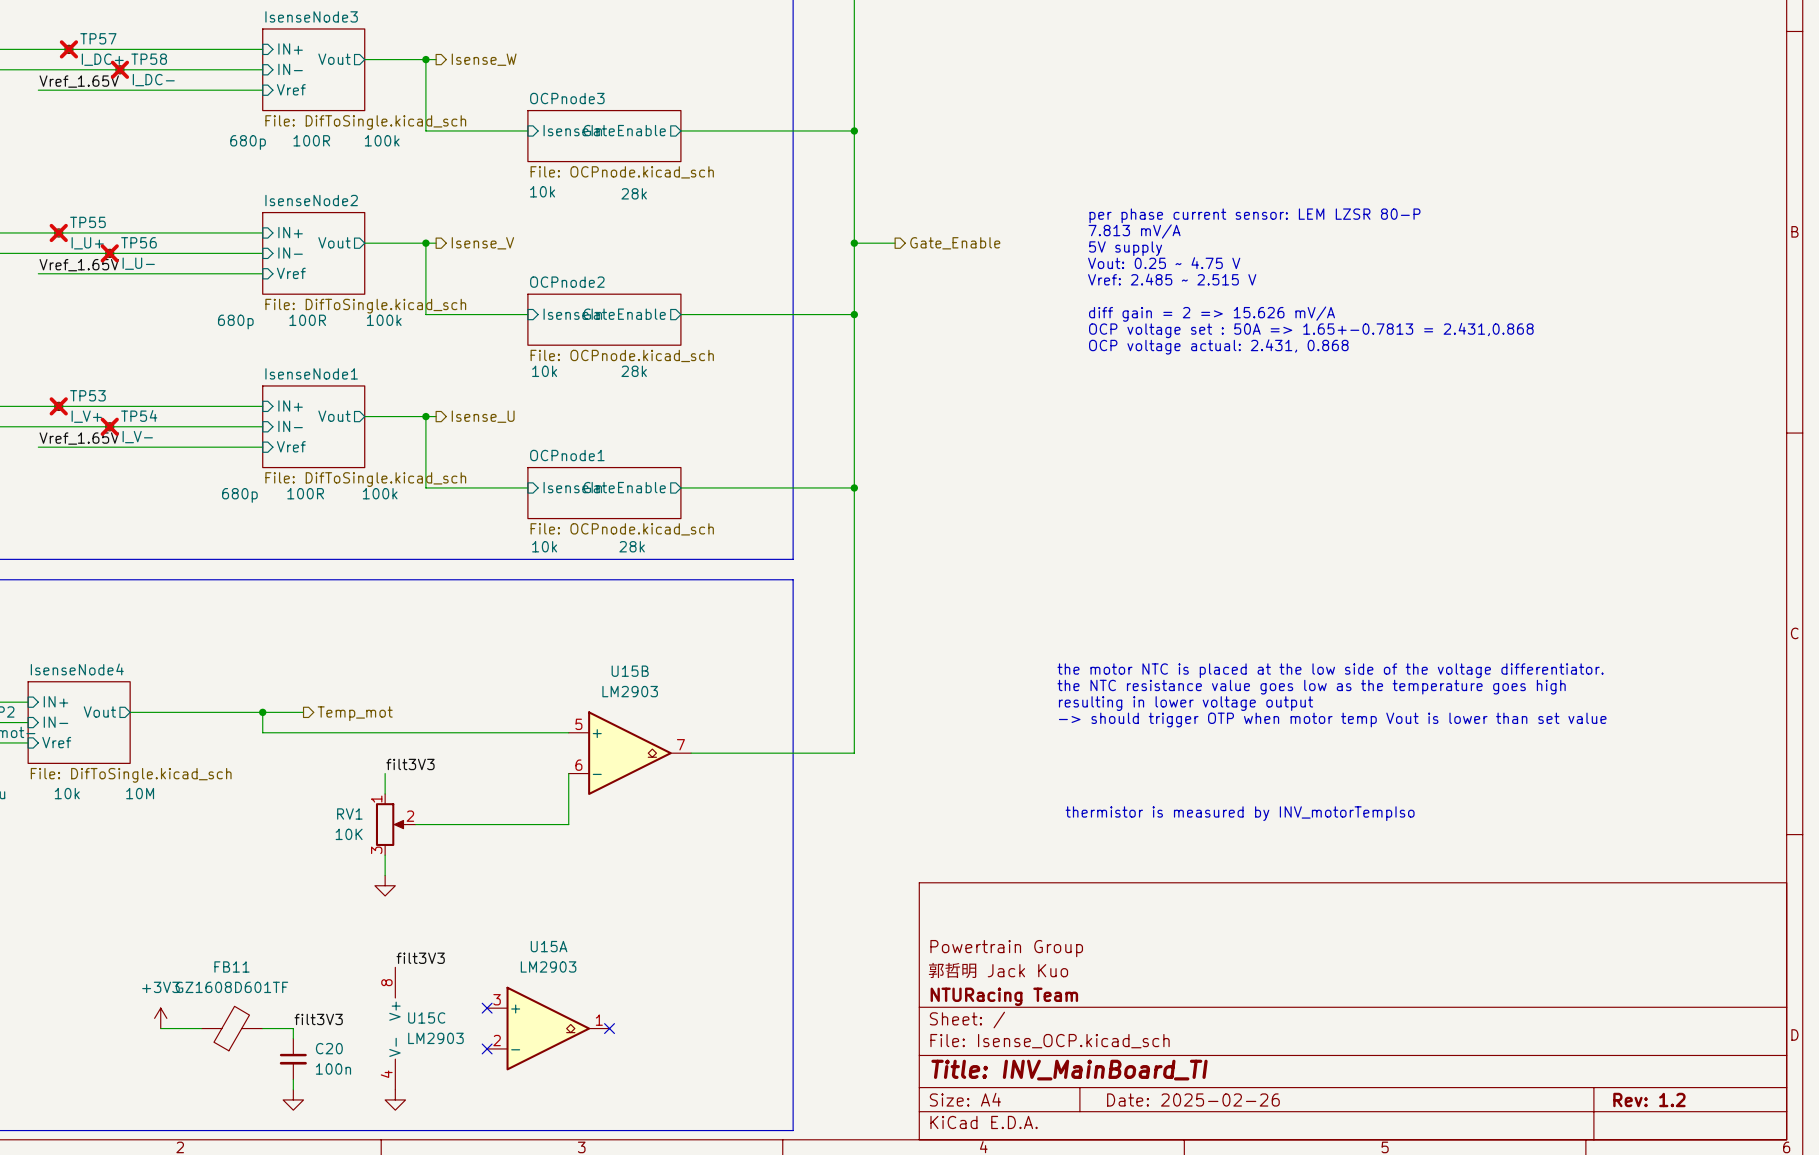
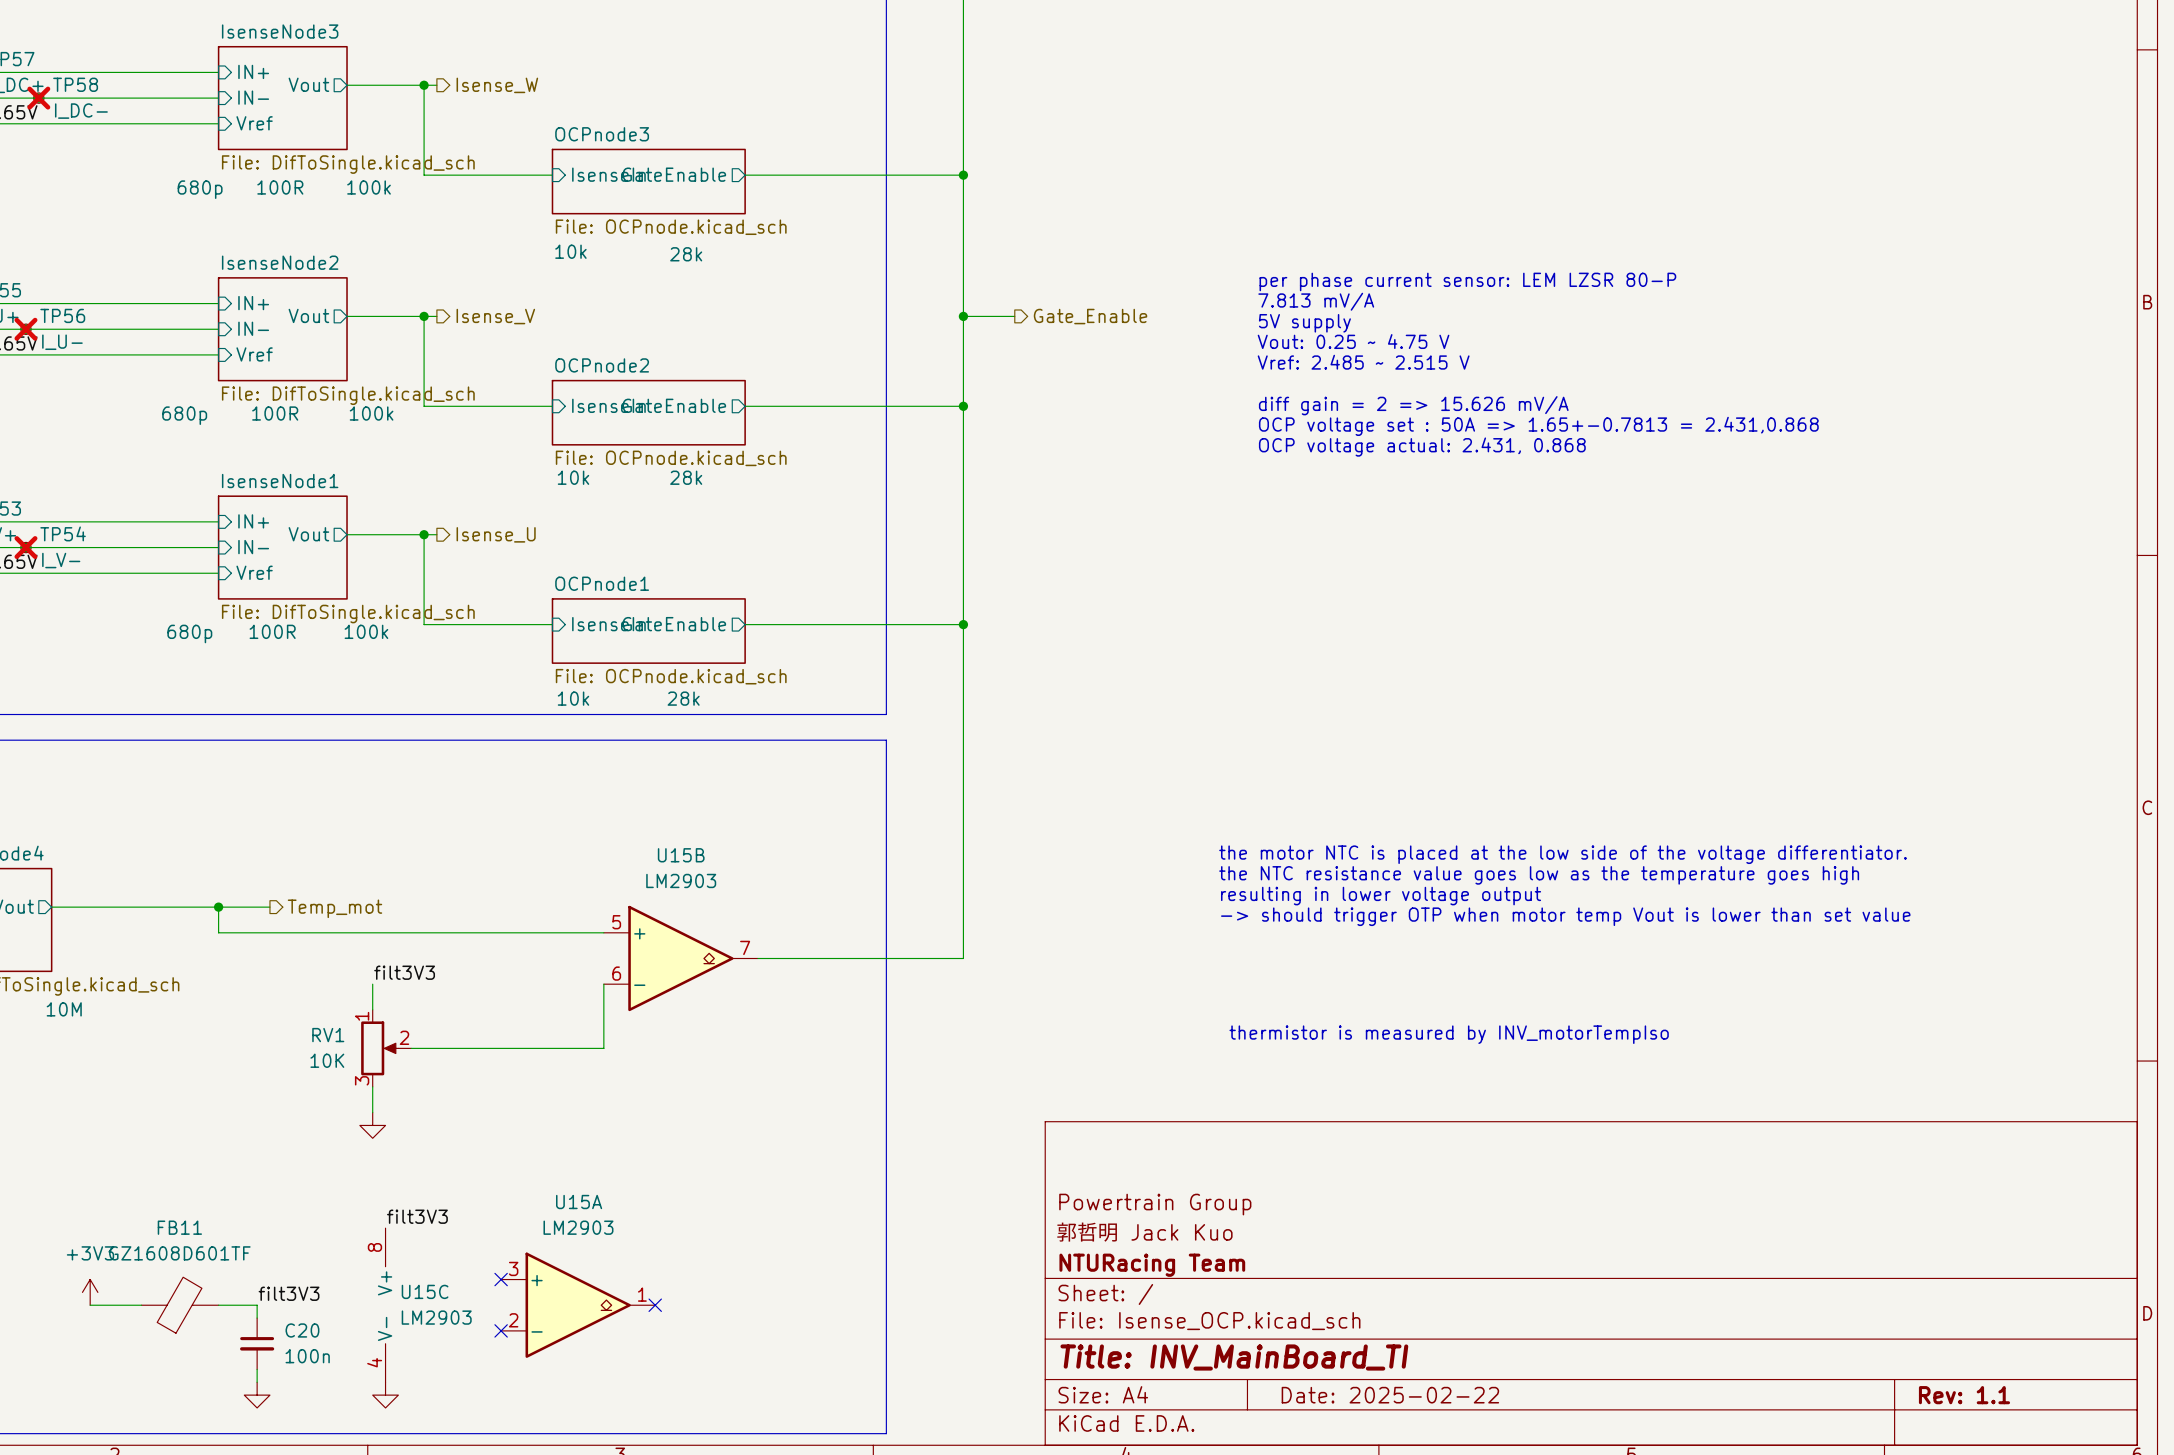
title block: Date: 2025-02-26 (1193, 1099) -> Date: 2025-02-22 (1390, 1395)
title block: Rev: 1.2 (1649, 1099) -> Rev: 1.1 (1964, 1395)

